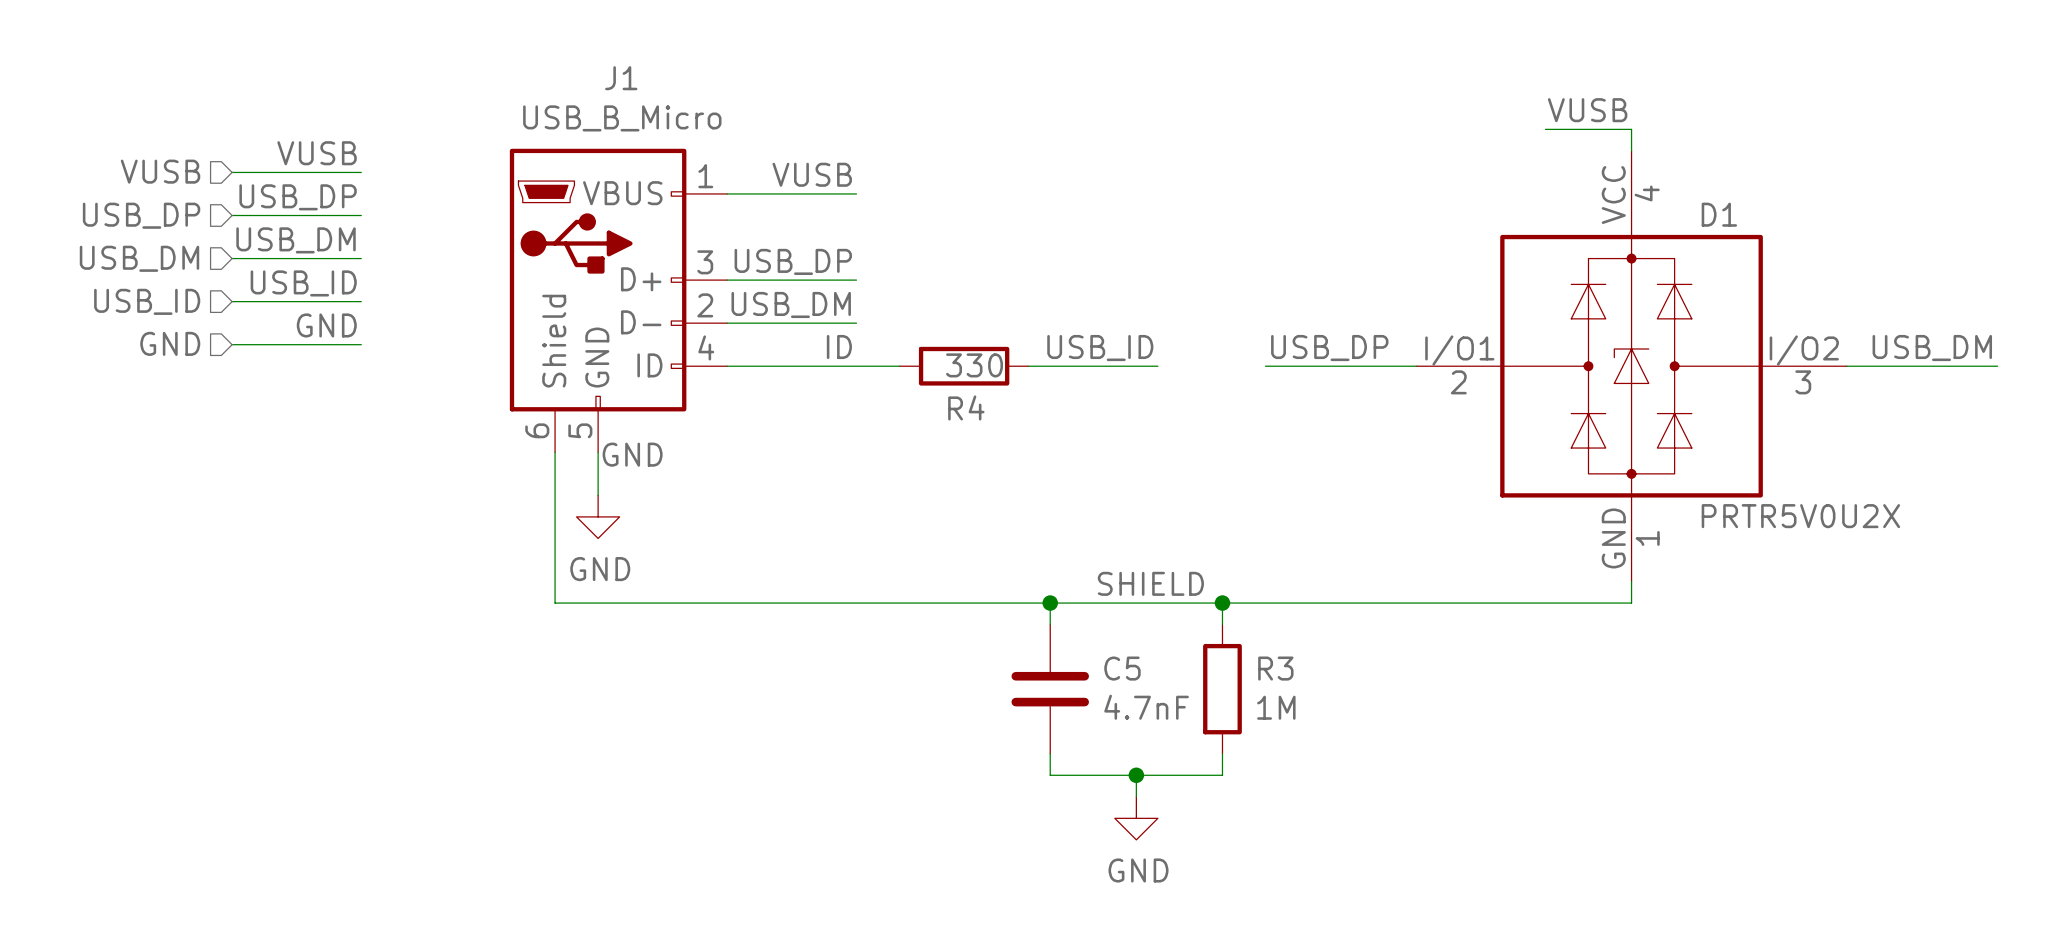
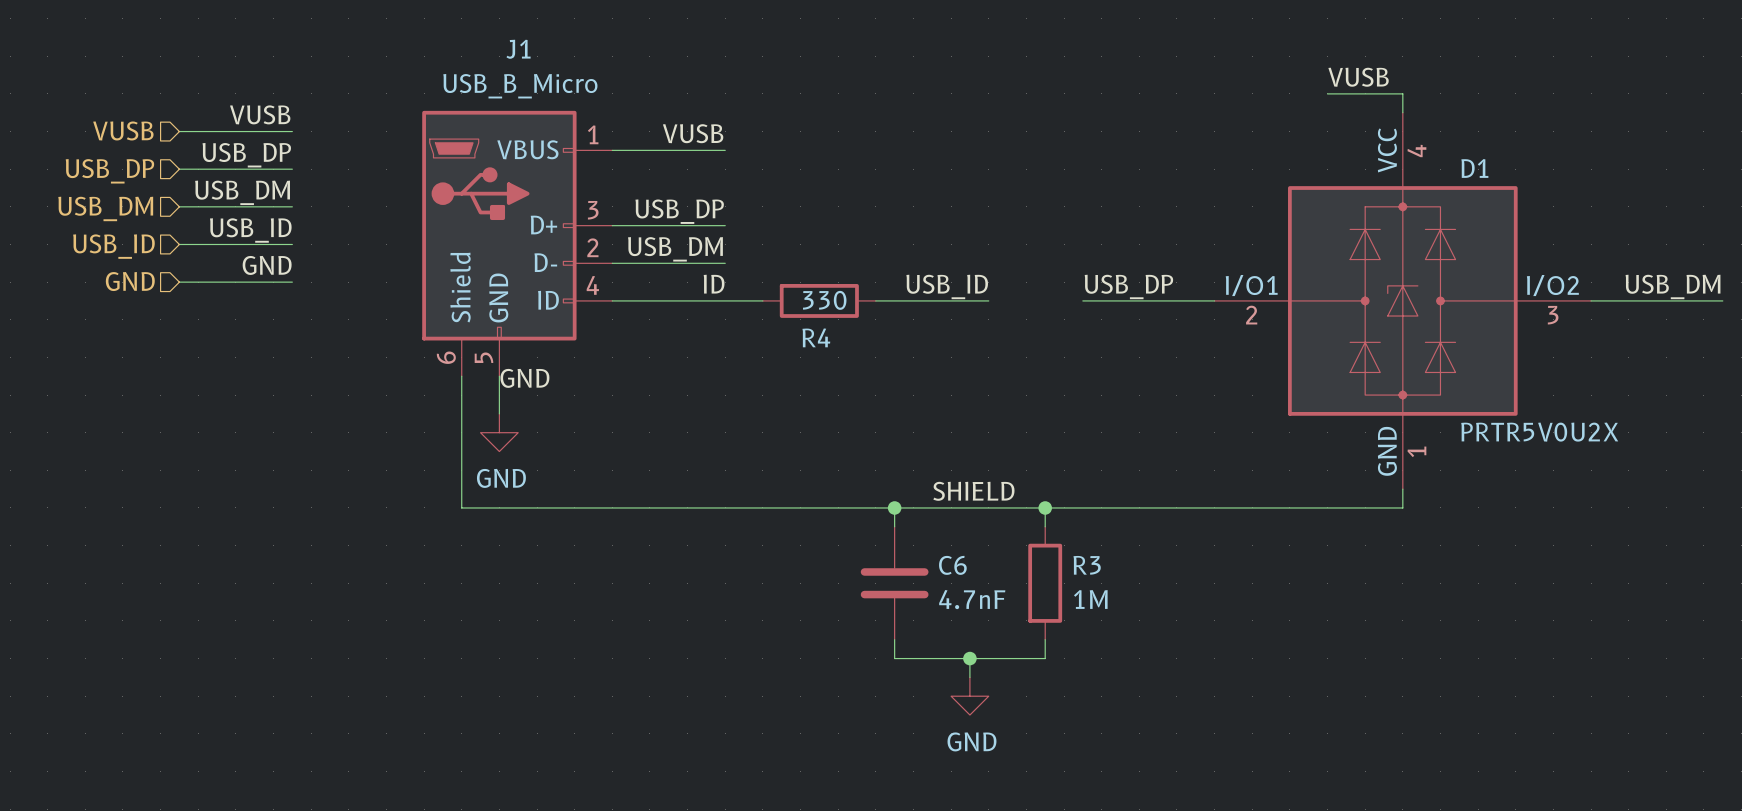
C5 name: C5 (1122, 668) -> C6 (952, 565)

